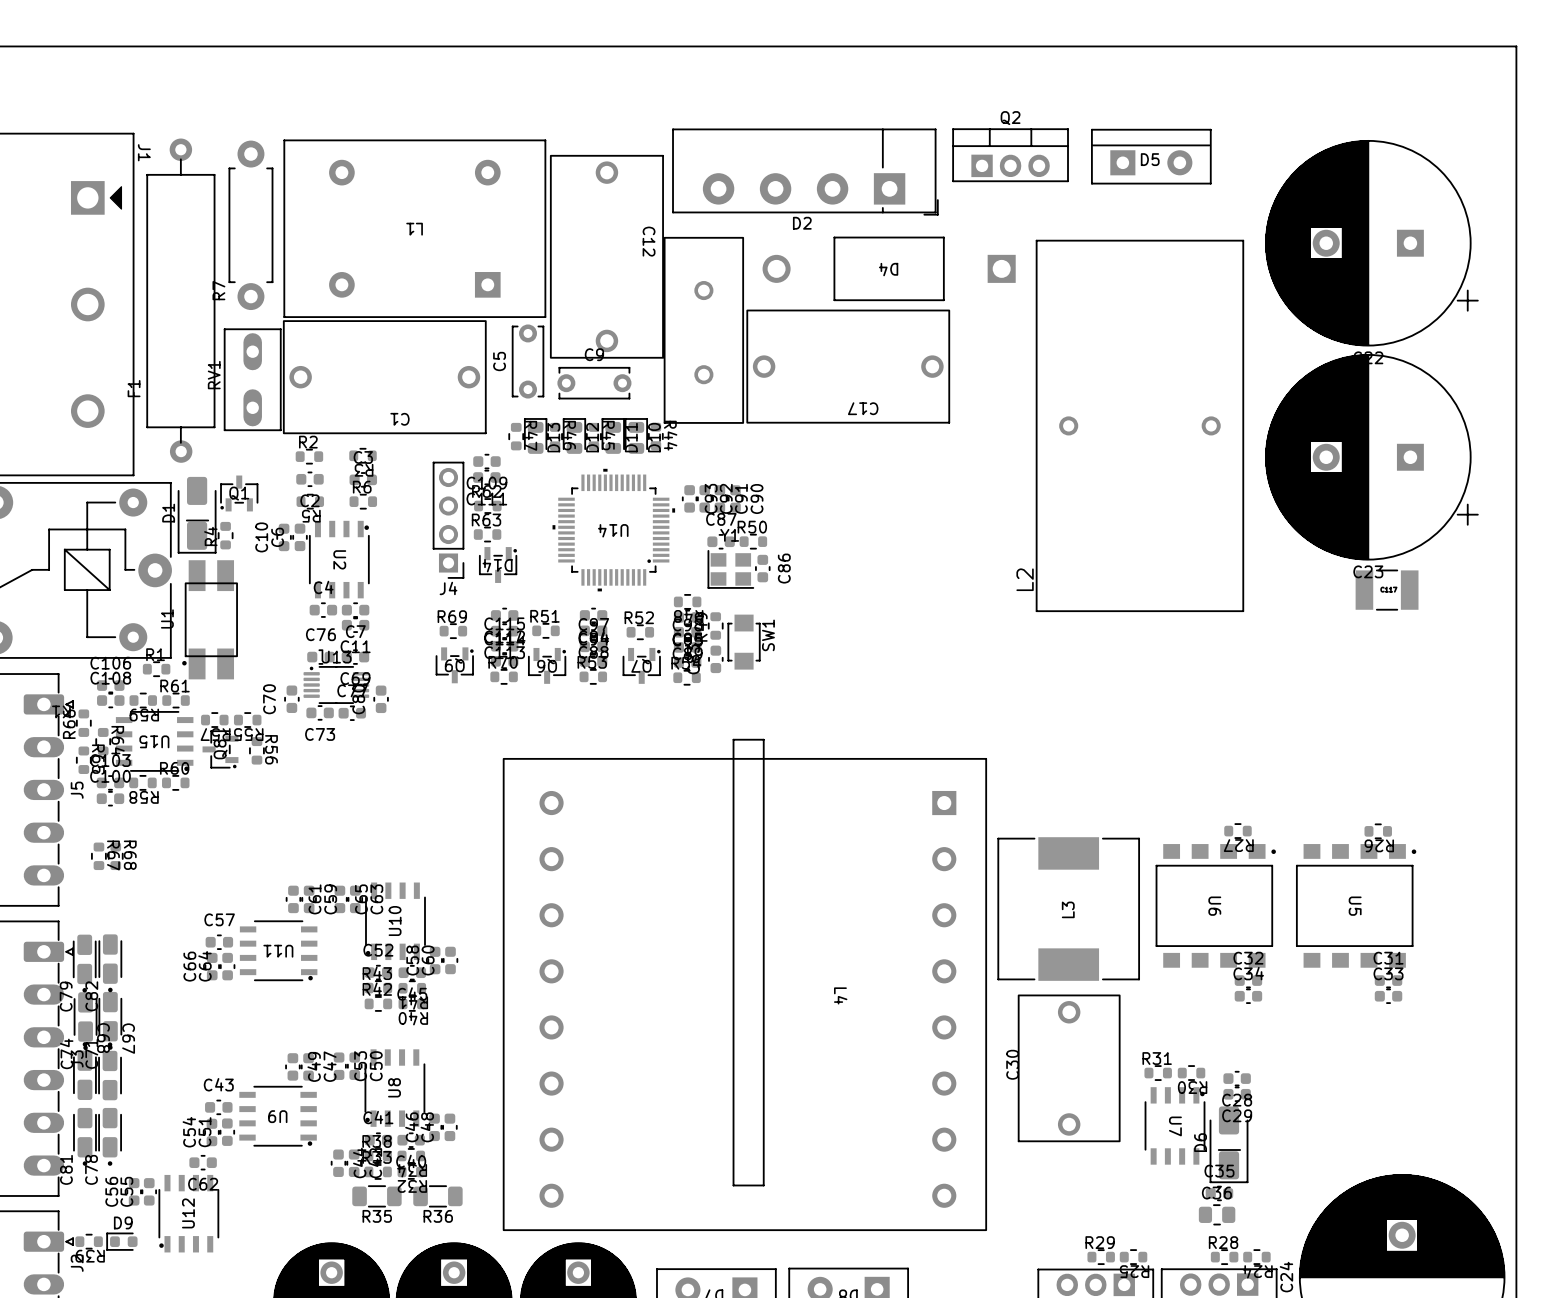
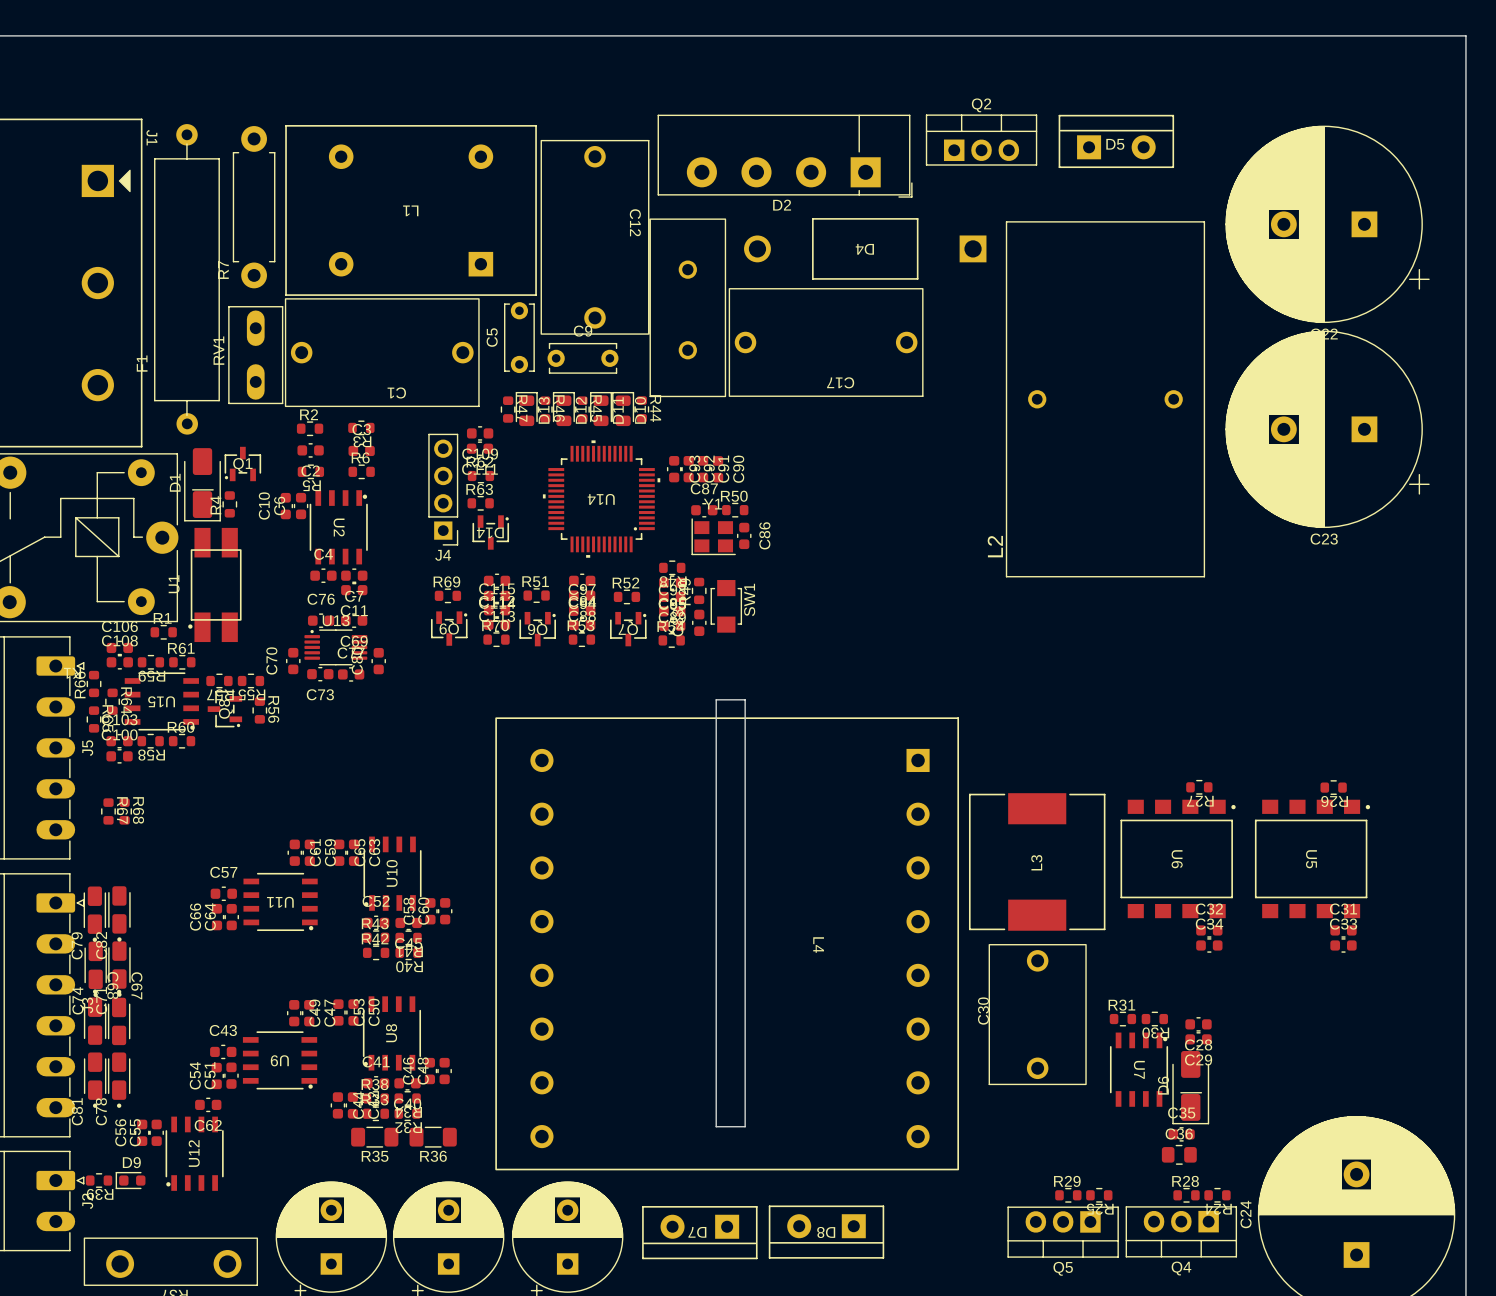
part: (1387, 590) -> none

